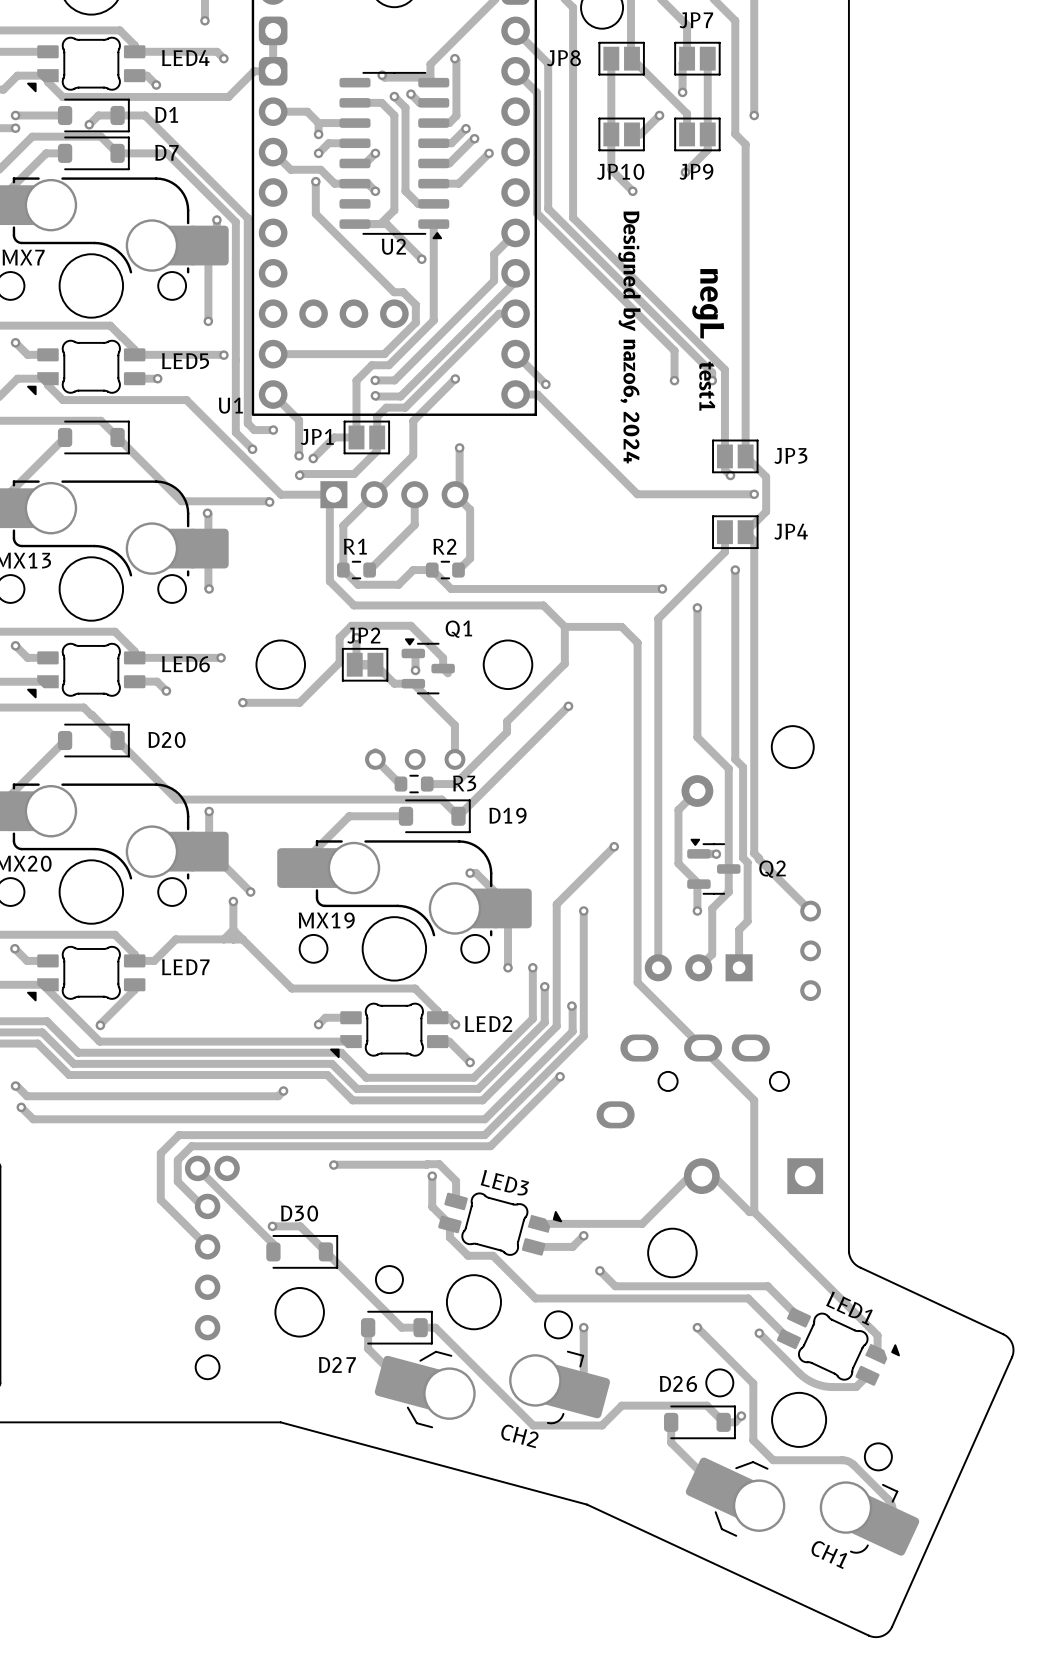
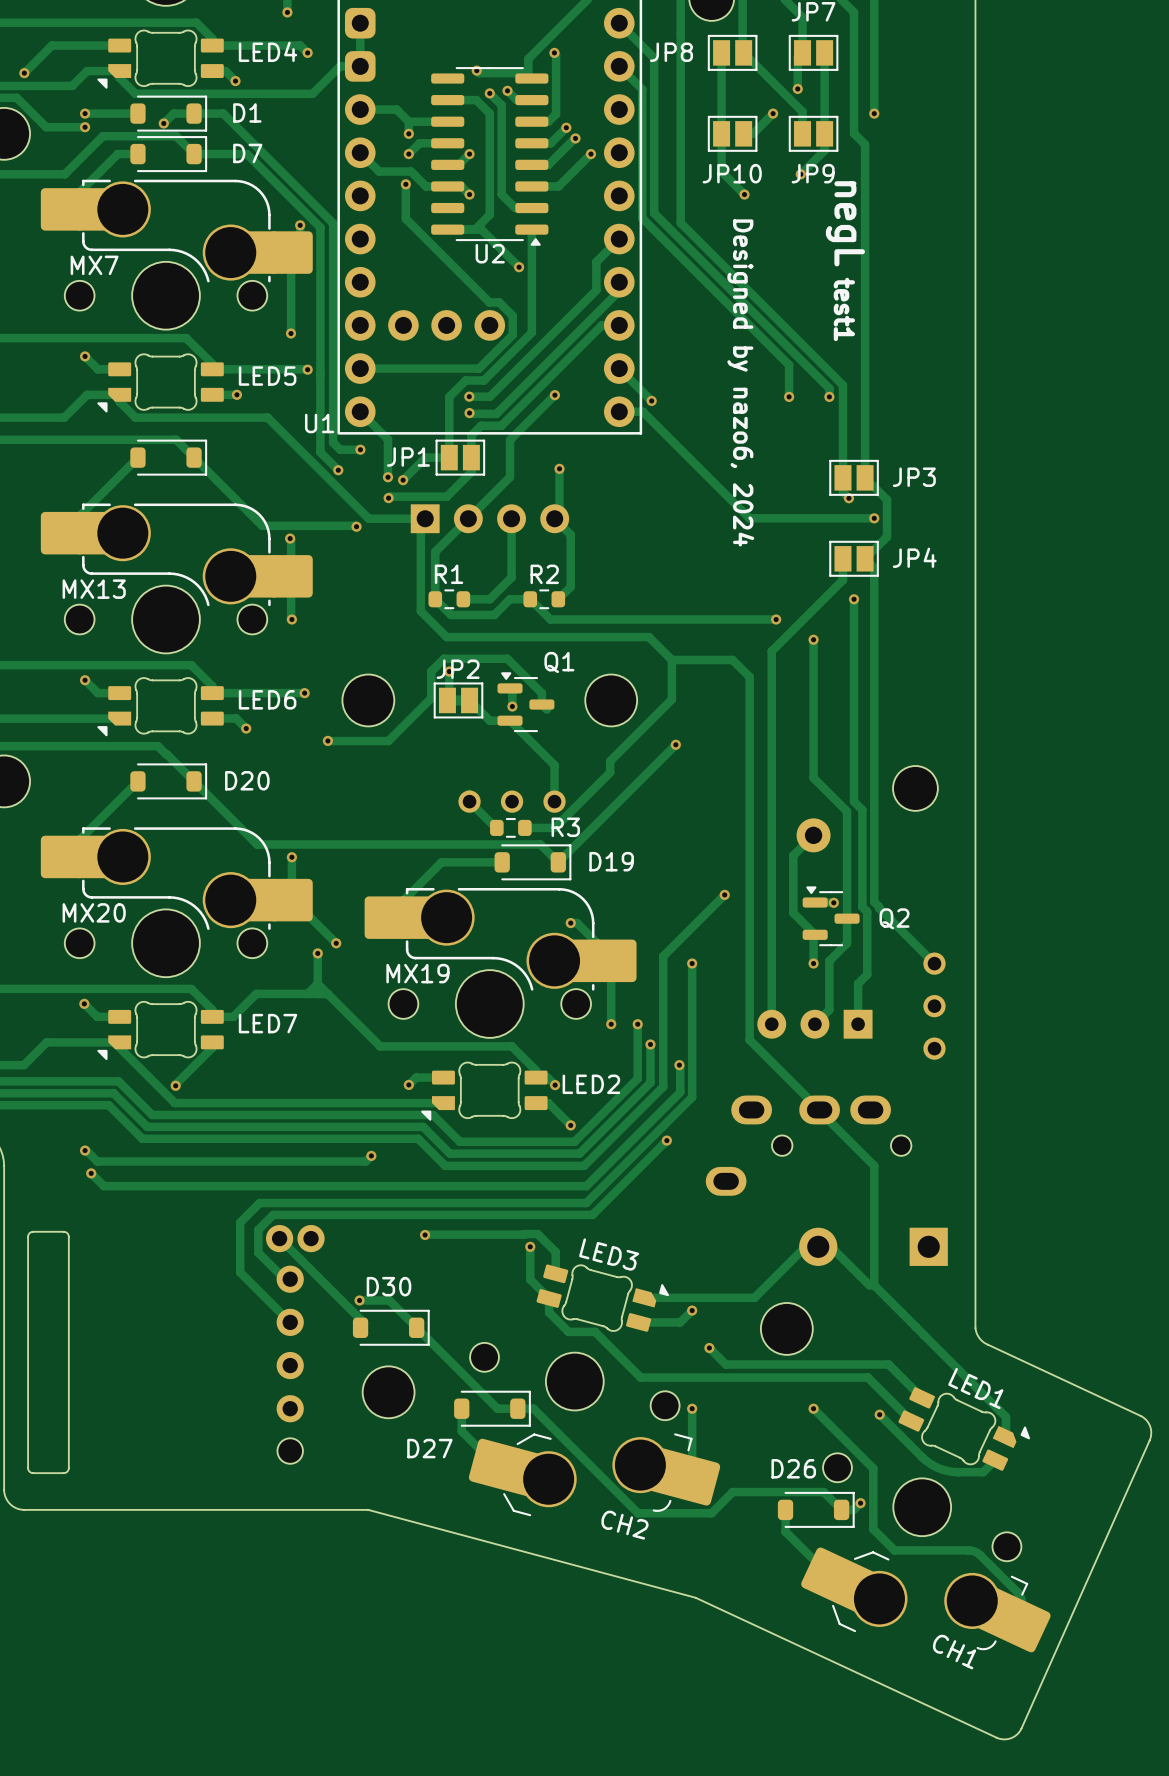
text position: negL (708, 303) -> negL (845, 223)
text position: test1 (707, 386) -> test1 (844, 309)
track: (414, 524) (369, 570) -> (511, 551) (511, 577) (489, 599) (463, 599)

